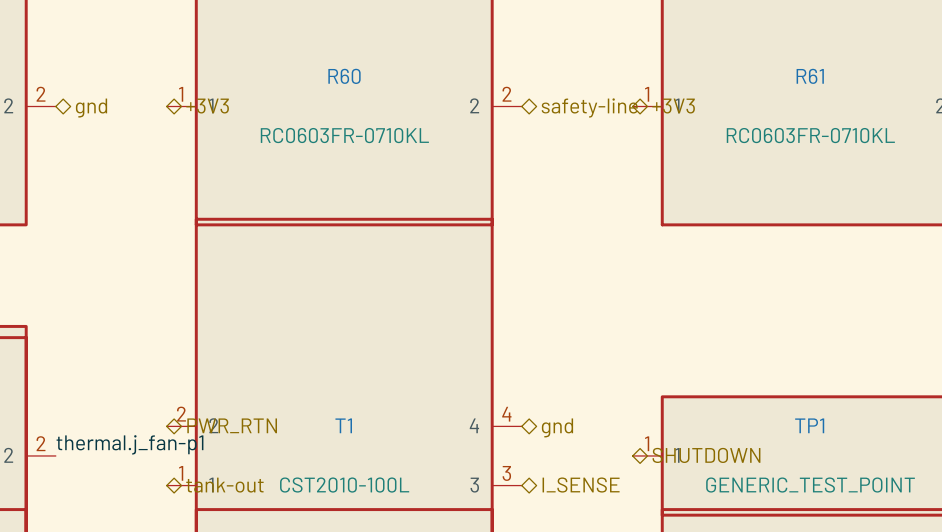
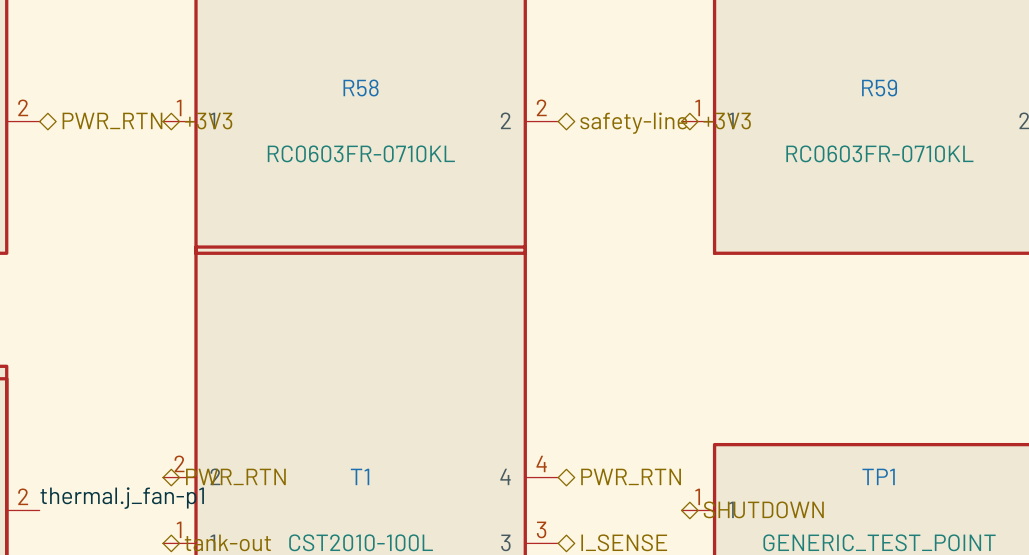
R60 name: R60 (344, 76) -> R58 (361, 87)
R61 name: R61 (810, 76) -> R59 (879, 88)
hierarchical label: gnd (91, 108) -> PWR_RTN (112, 120)
hierarchical label: gnd (557, 427) -> PWR_RTN (631, 476)

